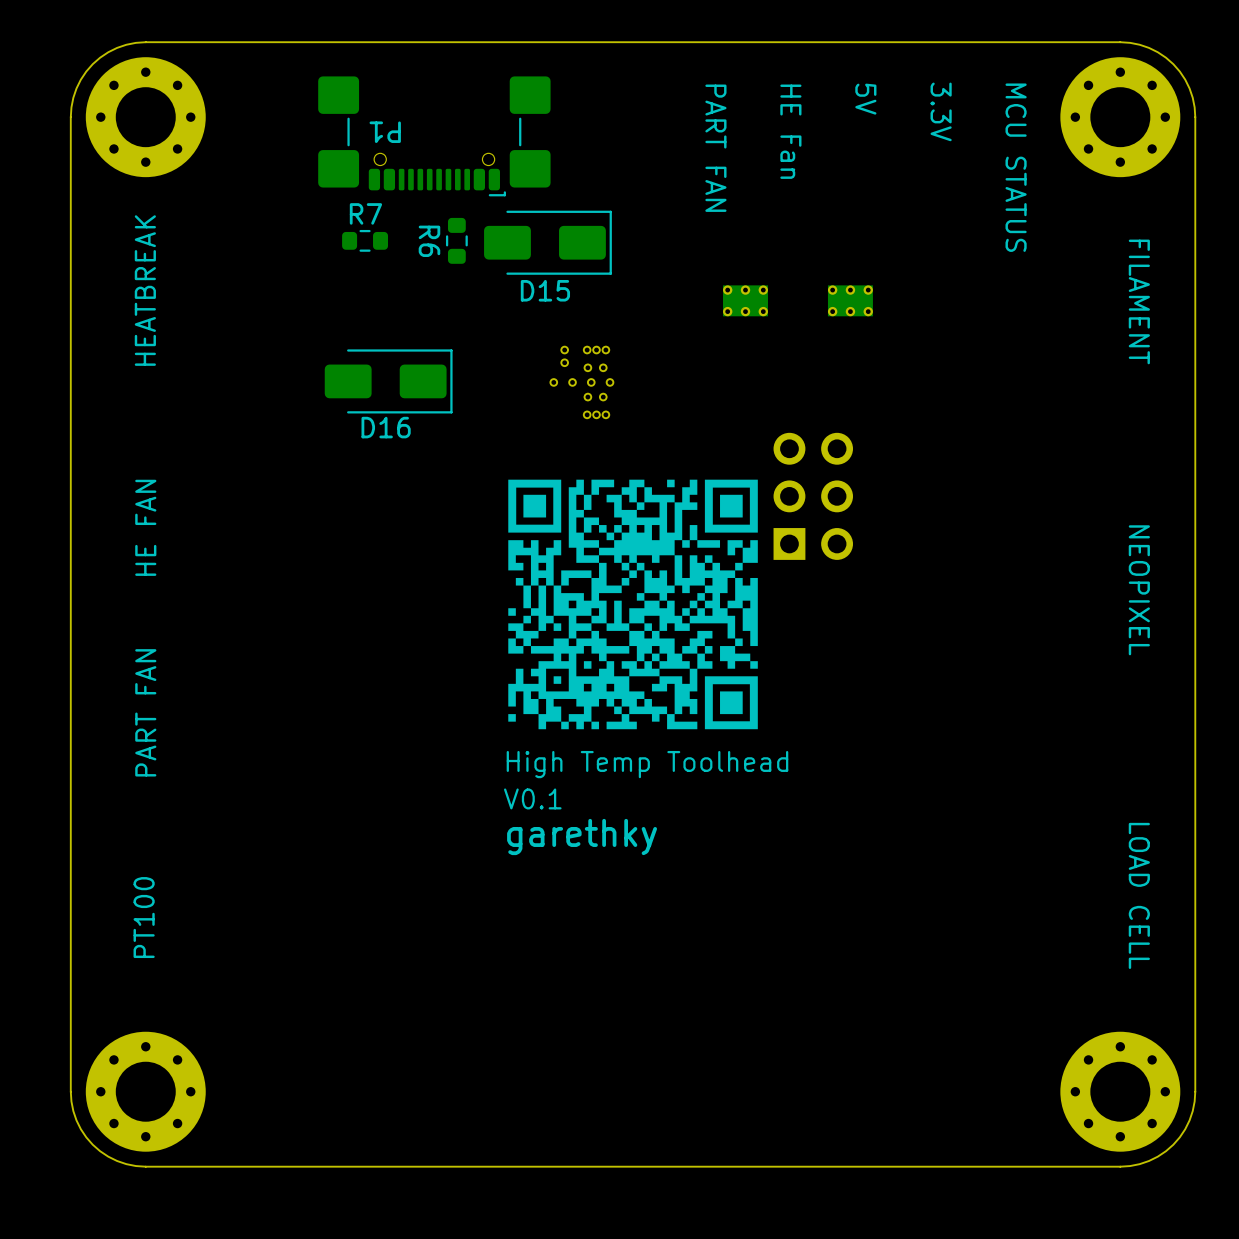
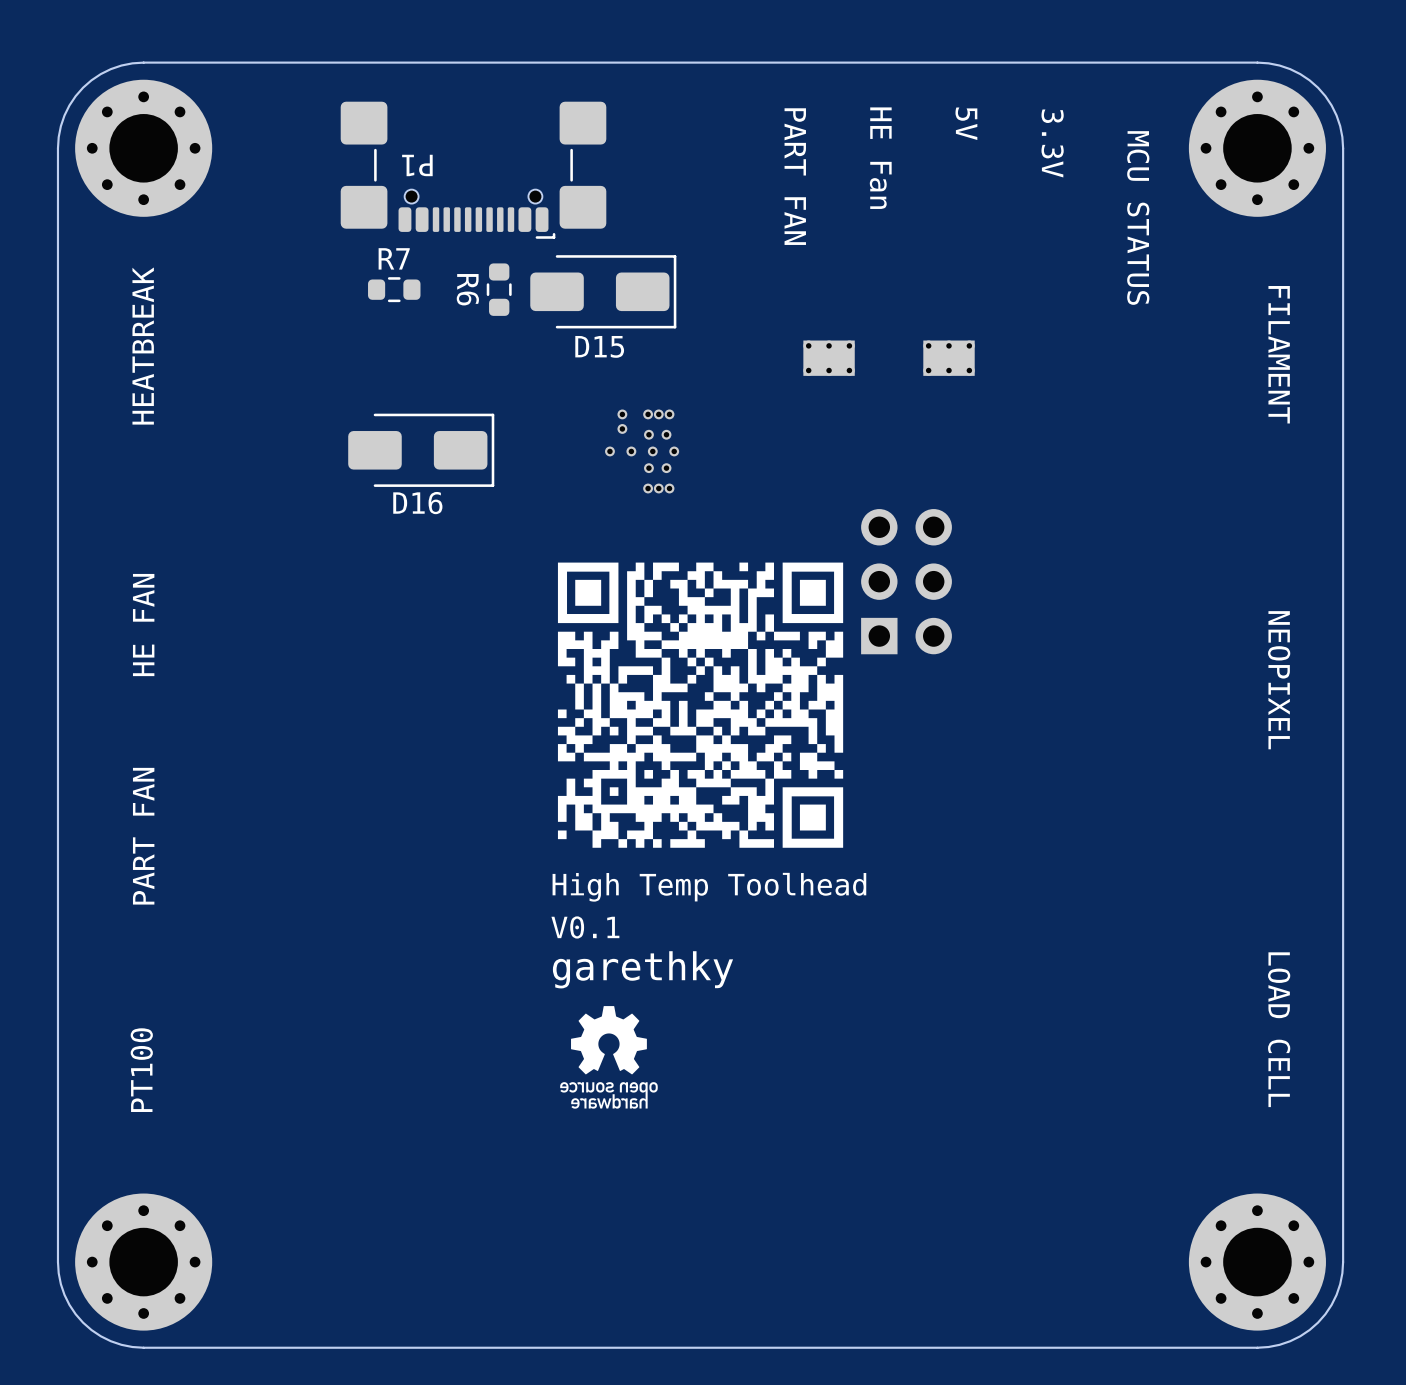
drawing: none -> [560, 1006, 658, 1109]

